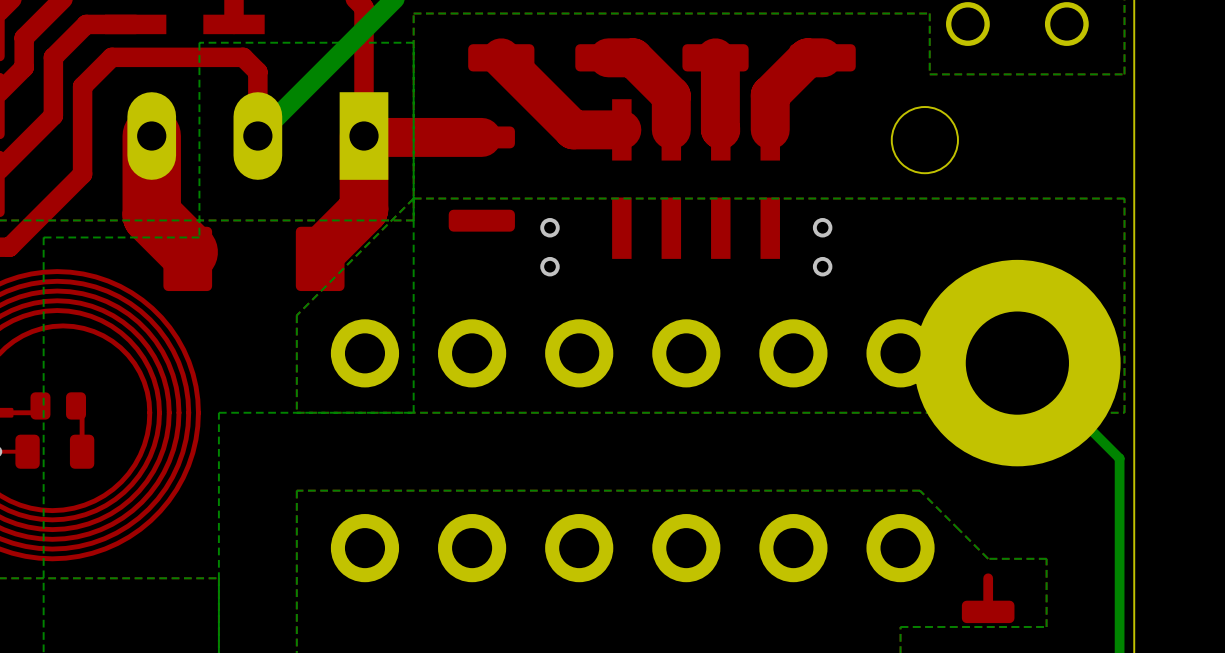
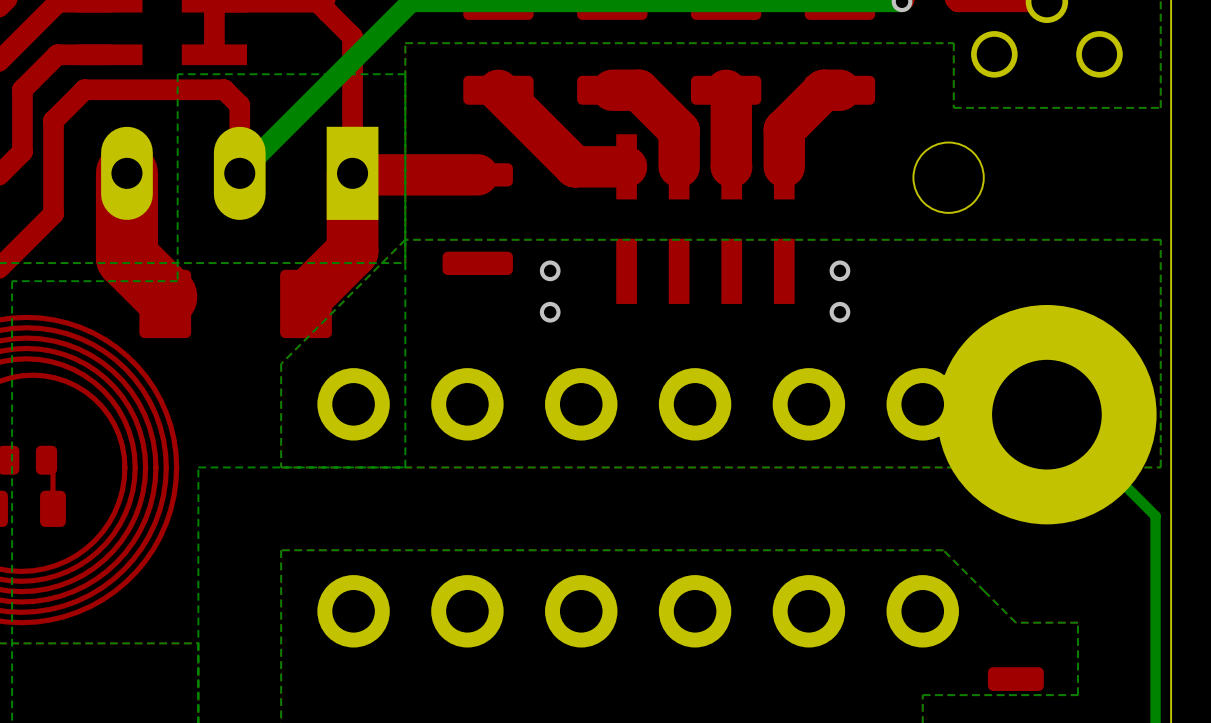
top track: (988, 578) (988, 611) -> none

